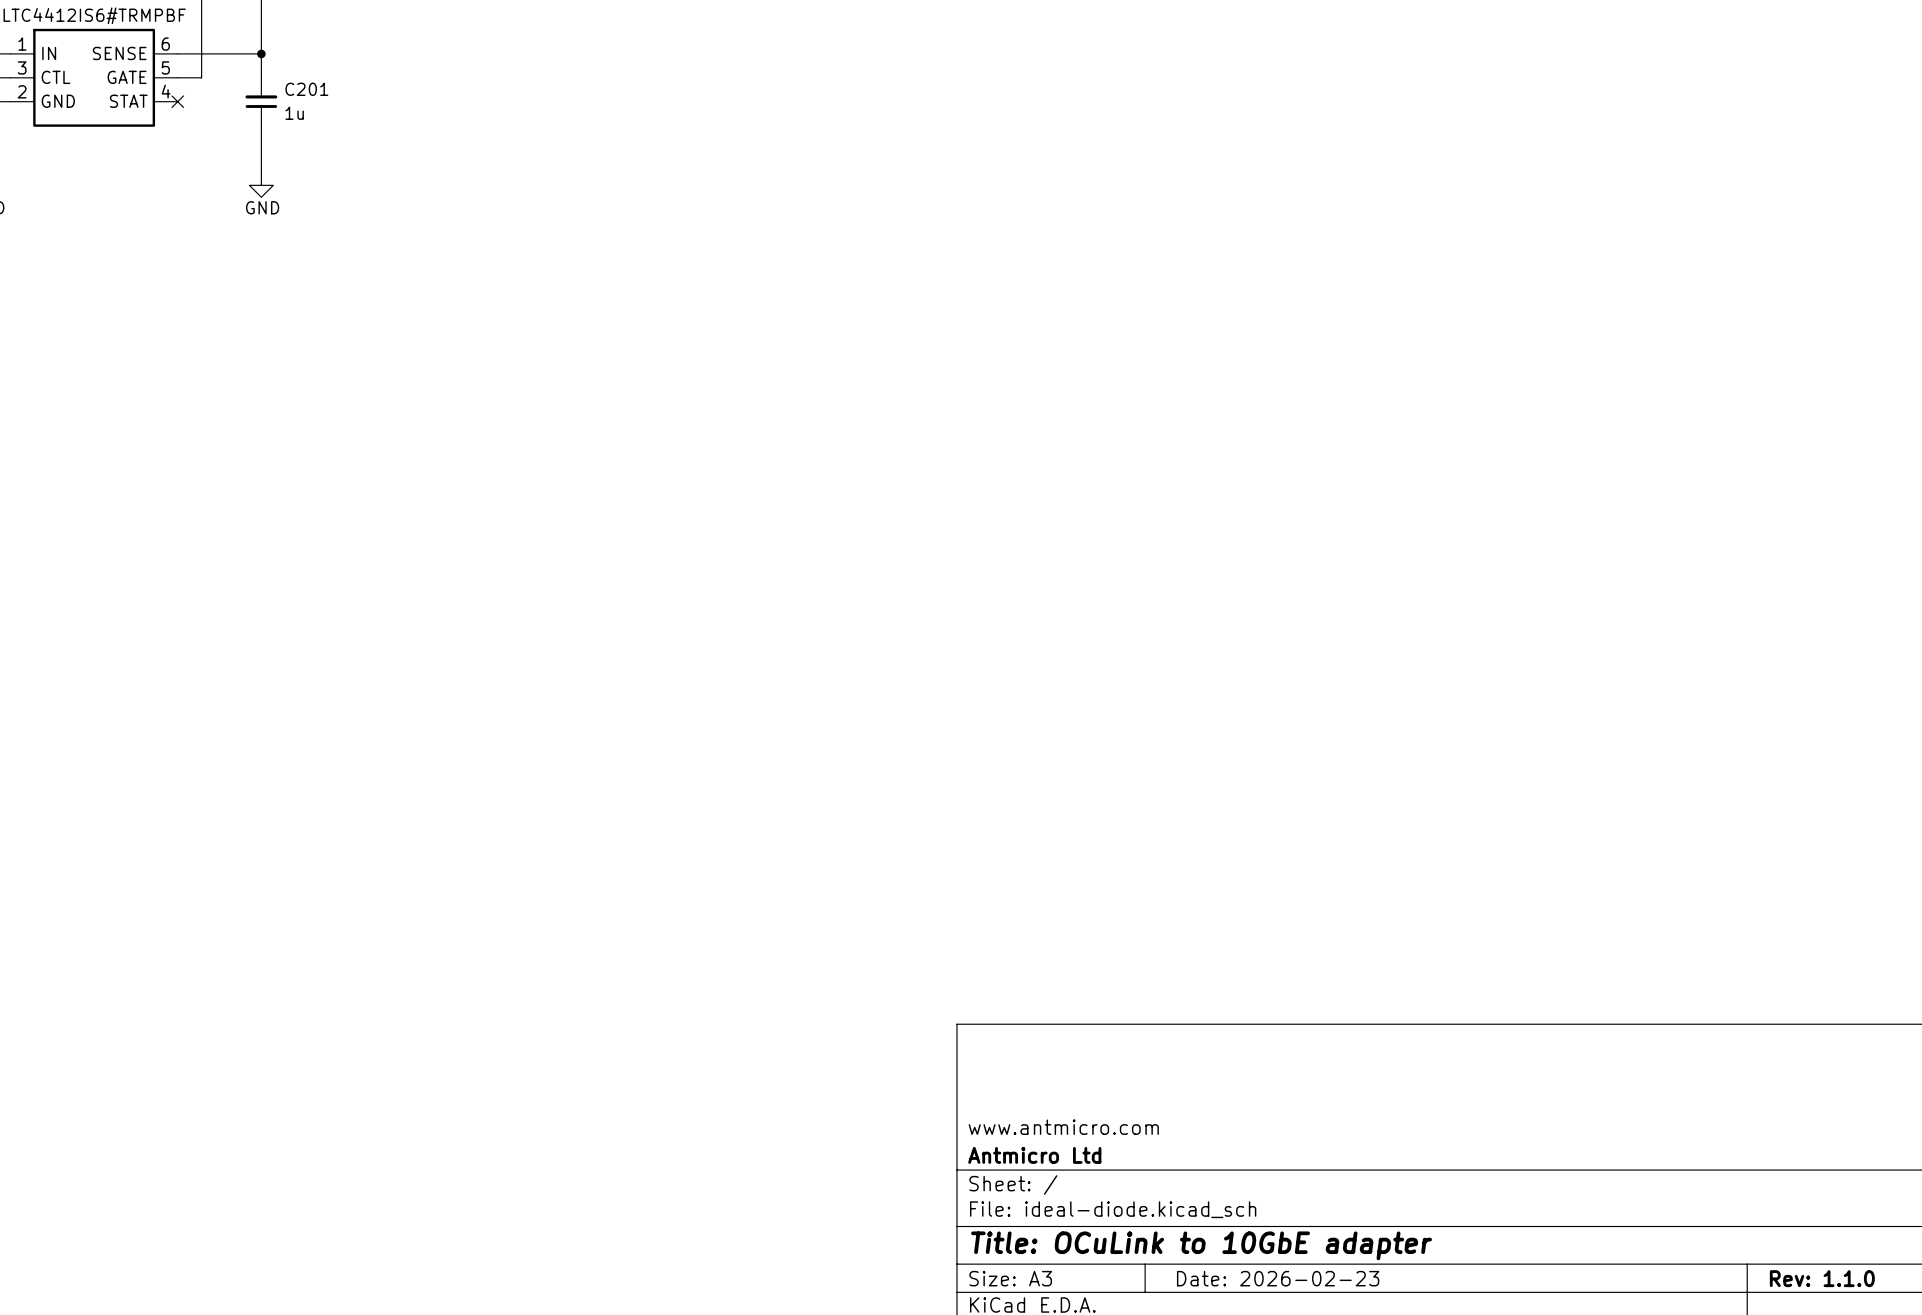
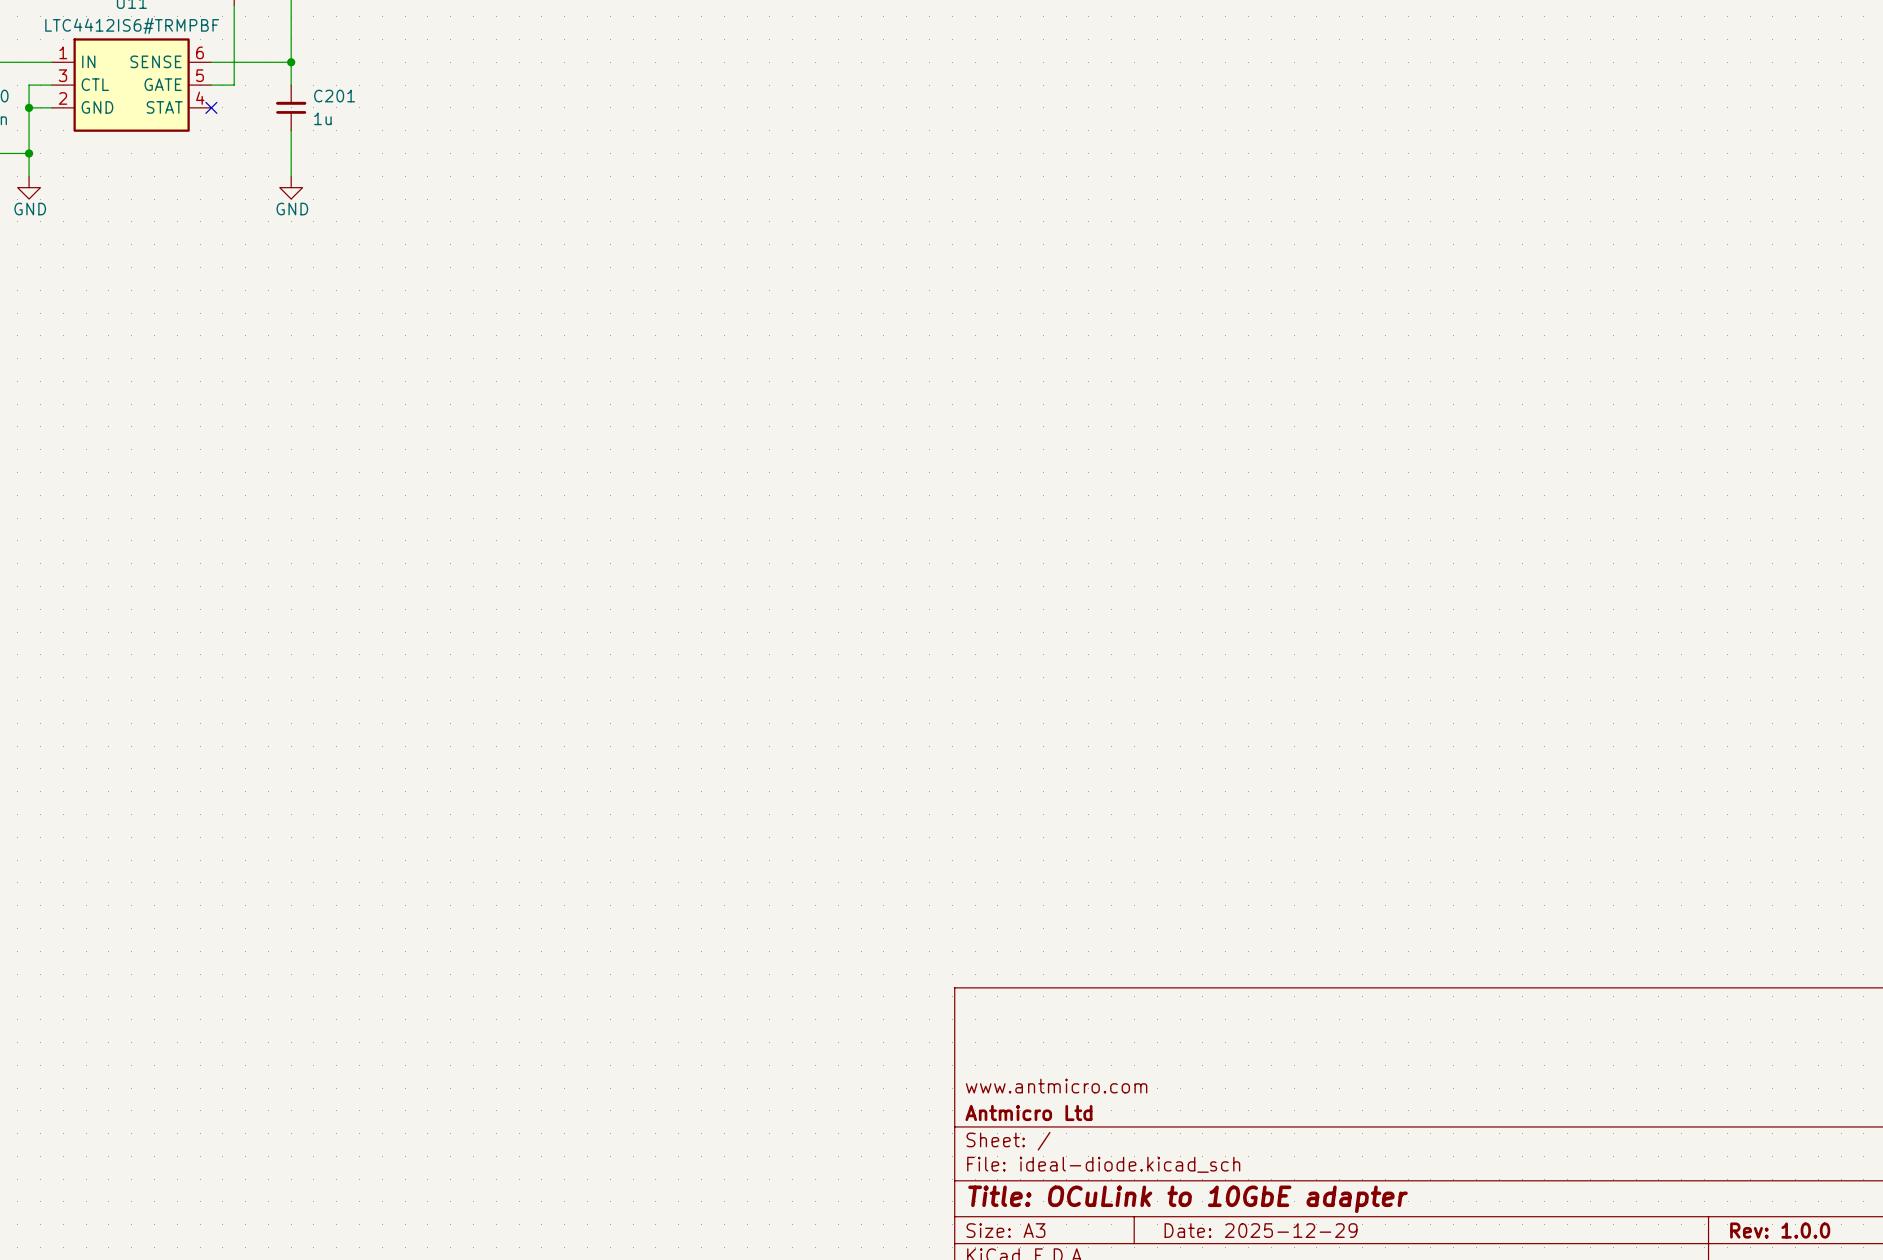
title block: Date: 2026-02-23 (1278, 1278) -> Date: 2025-12-29 (1261, 1230)
title block: Rev: 1.1.0 (1822, 1278) -> Rev: 1.0.0 (1780, 1230)

